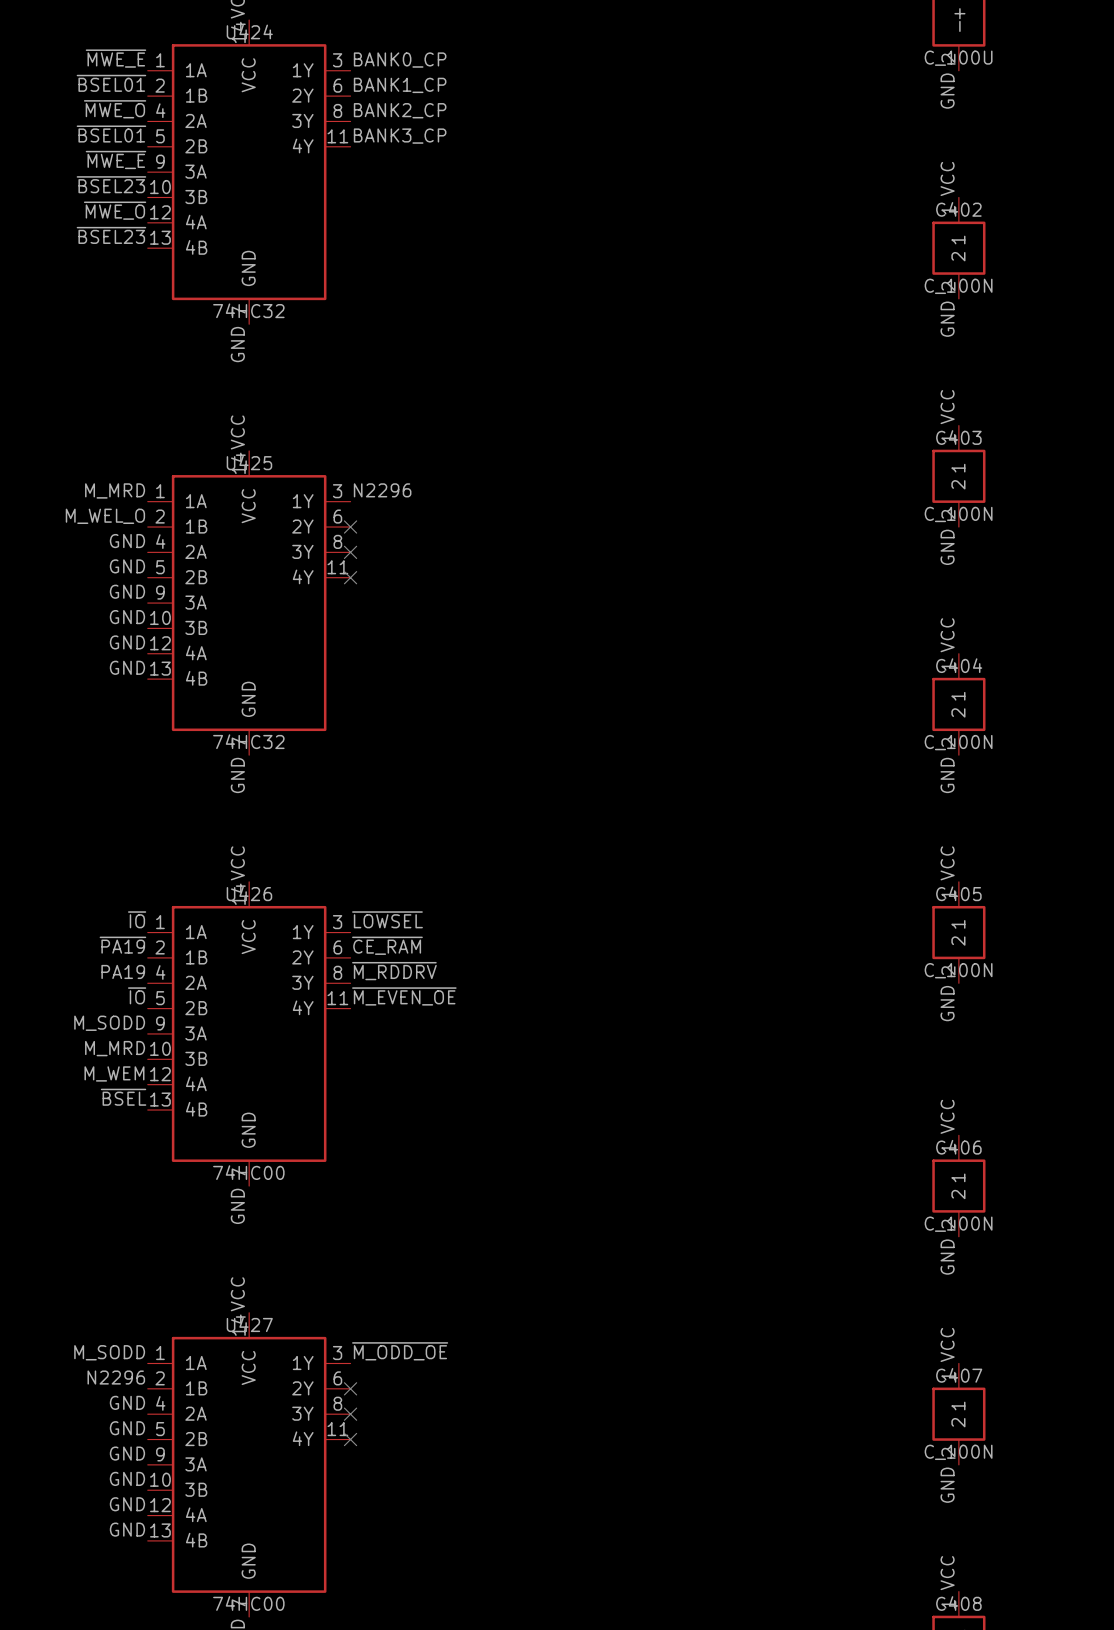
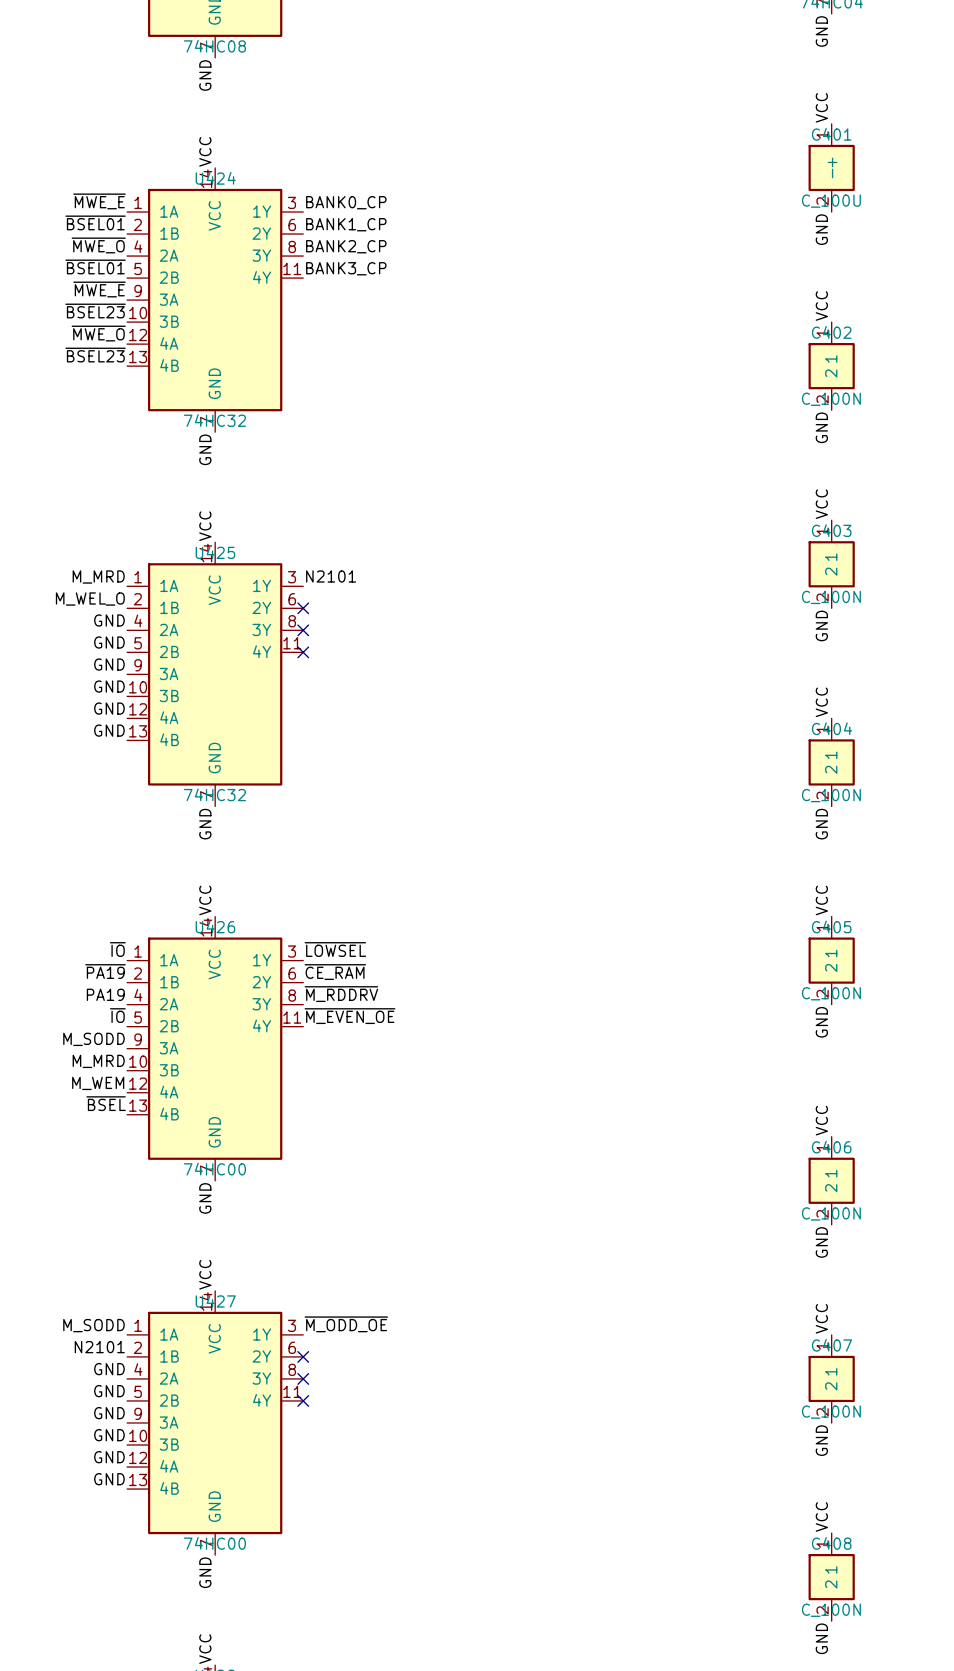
label: N2296 (382, 490) -> N2101 (331, 576)
label: N2296 (116, 1377) -> N2101 (99, 1347)

